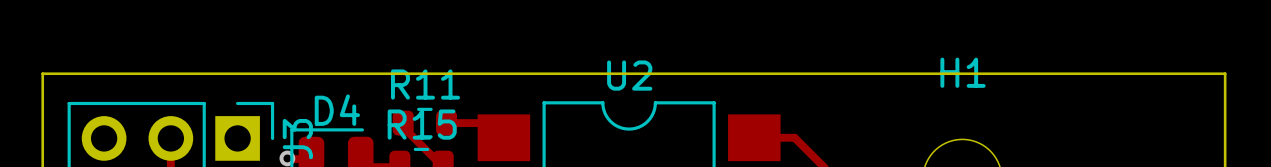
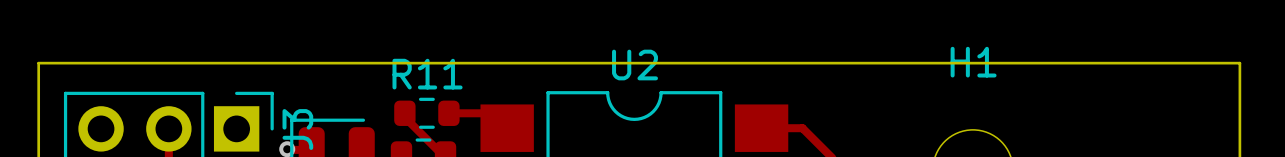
D4 name: D4 (337, 110) -> none
R15 name: R15 (422, 124) -> none

